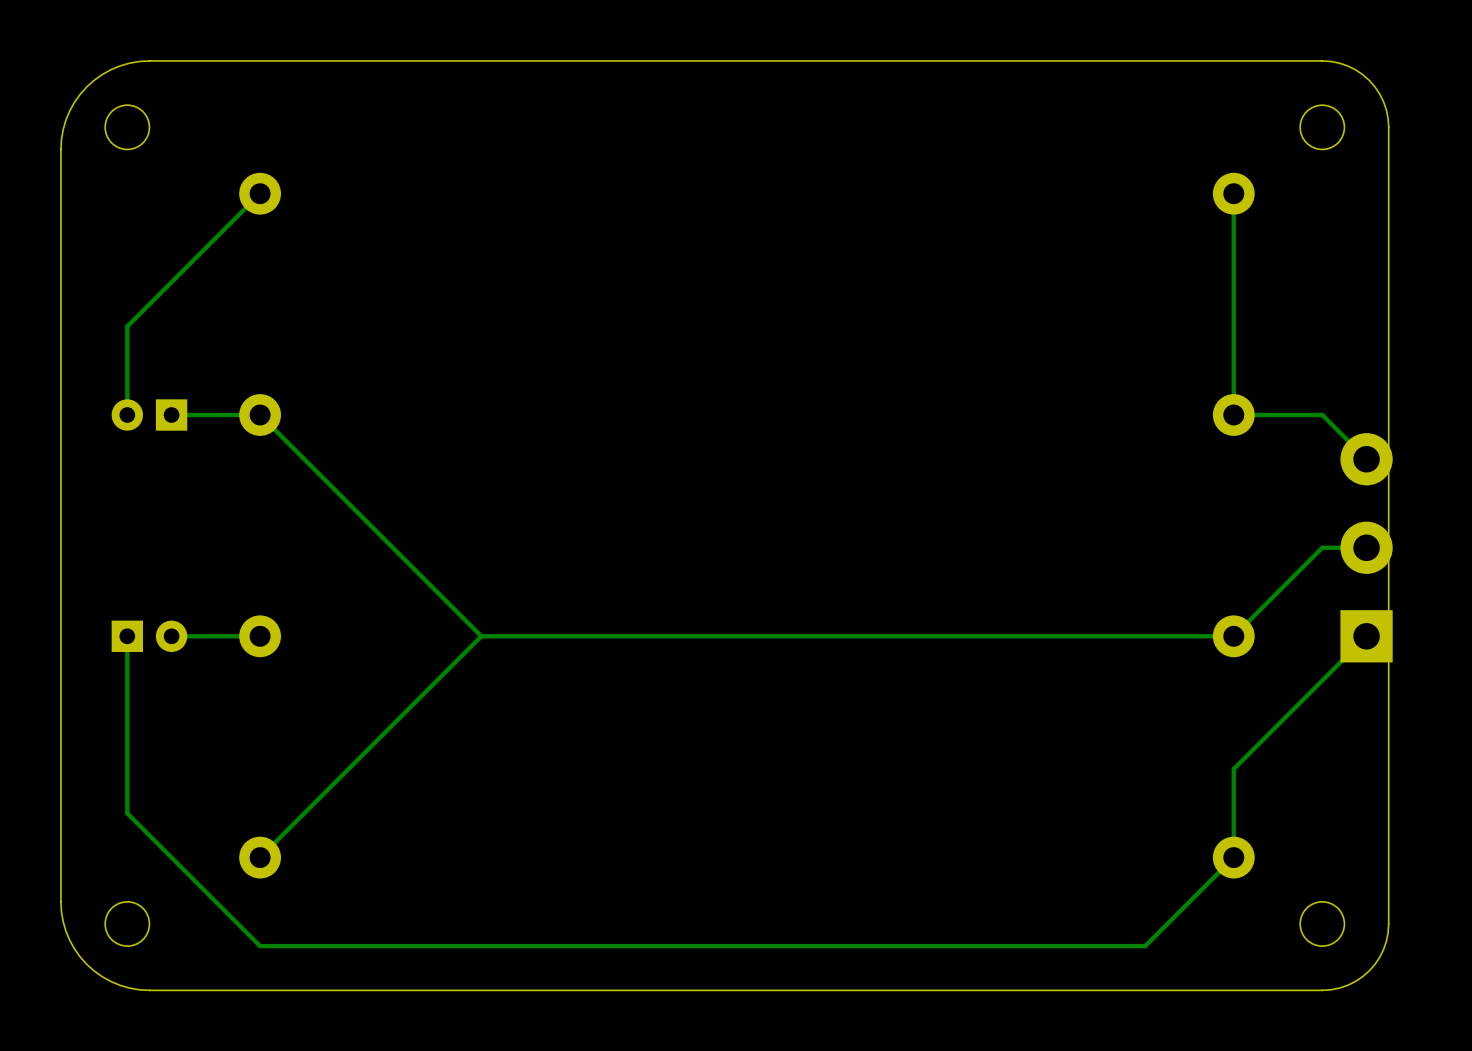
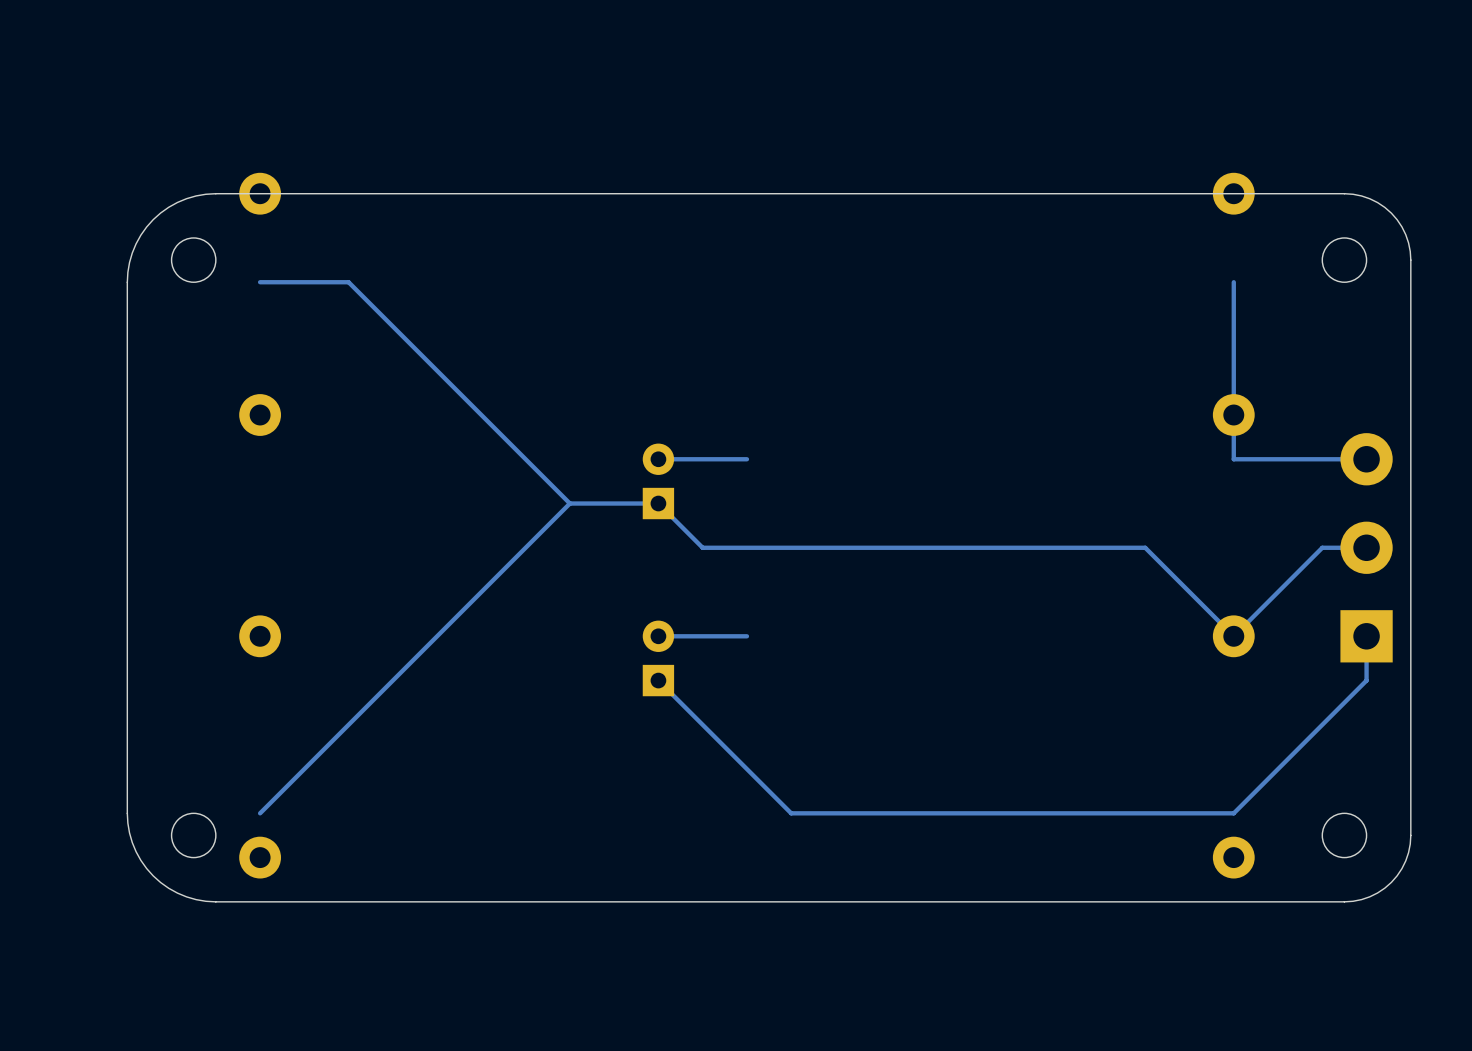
board edge: (1322, 60) (149, 60) (120, 65) (94, 80) (80, 94) (69, 111) (63, 129) (60, 149) (60, 901) (65, 931) (80, 957) (94, 971) (111, 981) (129, 988) (149, 990) (1322, 990) (1347, 985) (1362, 976) (1379, 957) (1386, 941) (1388, 923) (1388, 127) (1383, 101) (1369, 80) (1347, 65) (1322, 60) -> (1344, 193) (1369, 198) (1391, 213) (1405, 234) (1410, 260) (1410, 835) (1408, 852) (1401, 868) (1391, 882) (1377, 892) (1361, 899) (1344, 901) (215, 901) (186, 896) (168, 888) (146, 868) (136, 851) (129, 833) (127, 813) (127, 272) (136, 243) (146, 227) (160, 213) (177, 202) (196, 195) (215, 193) (1344, 193)
round board edge position: (127, 127) -> (193, 260)
round board edge position: (1322, 127) -> (1344, 260)
track: (260, 193) (127, 326) (127, 415) -> none
track: (1233, 193) (1233, 282) -> none
part: (149, 415) -> none
track: (171, 415) (260, 415) (481, 636) -> (260, 282) (348, 282) (569, 503)
track: (1233, 415) (1322, 415) (1366, 459) -> (1233, 415) (1233, 459) (1366, 459)
track: none -> (746, 459) (658, 459)
part: none -> (658, 481)
track: none -> (569, 503) (260, 813)
part: (149, 636) -> none
track: (260, 636) (171, 636) -> none
track: (481, 636) (260, 857) -> none
track: (658, 636) (481, 636) -> none
track: (1233, 636) (746, 636) -> (1233, 636) (1145, 547) (702, 547) (658, 503) (569, 503)
track: (1366, 636) (1233, 769) (1233, 857) (1145, 946) (260, 946) (127, 813) (127, 636) -> (1366, 636) (1366, 680) (1233, 813) (791, 813) (658, 680)
part: none -> (658, 658)
round board edge position: (127, 923) -> (193, 835)
round board edge position: (1322, 923) -> (1344, 835)

